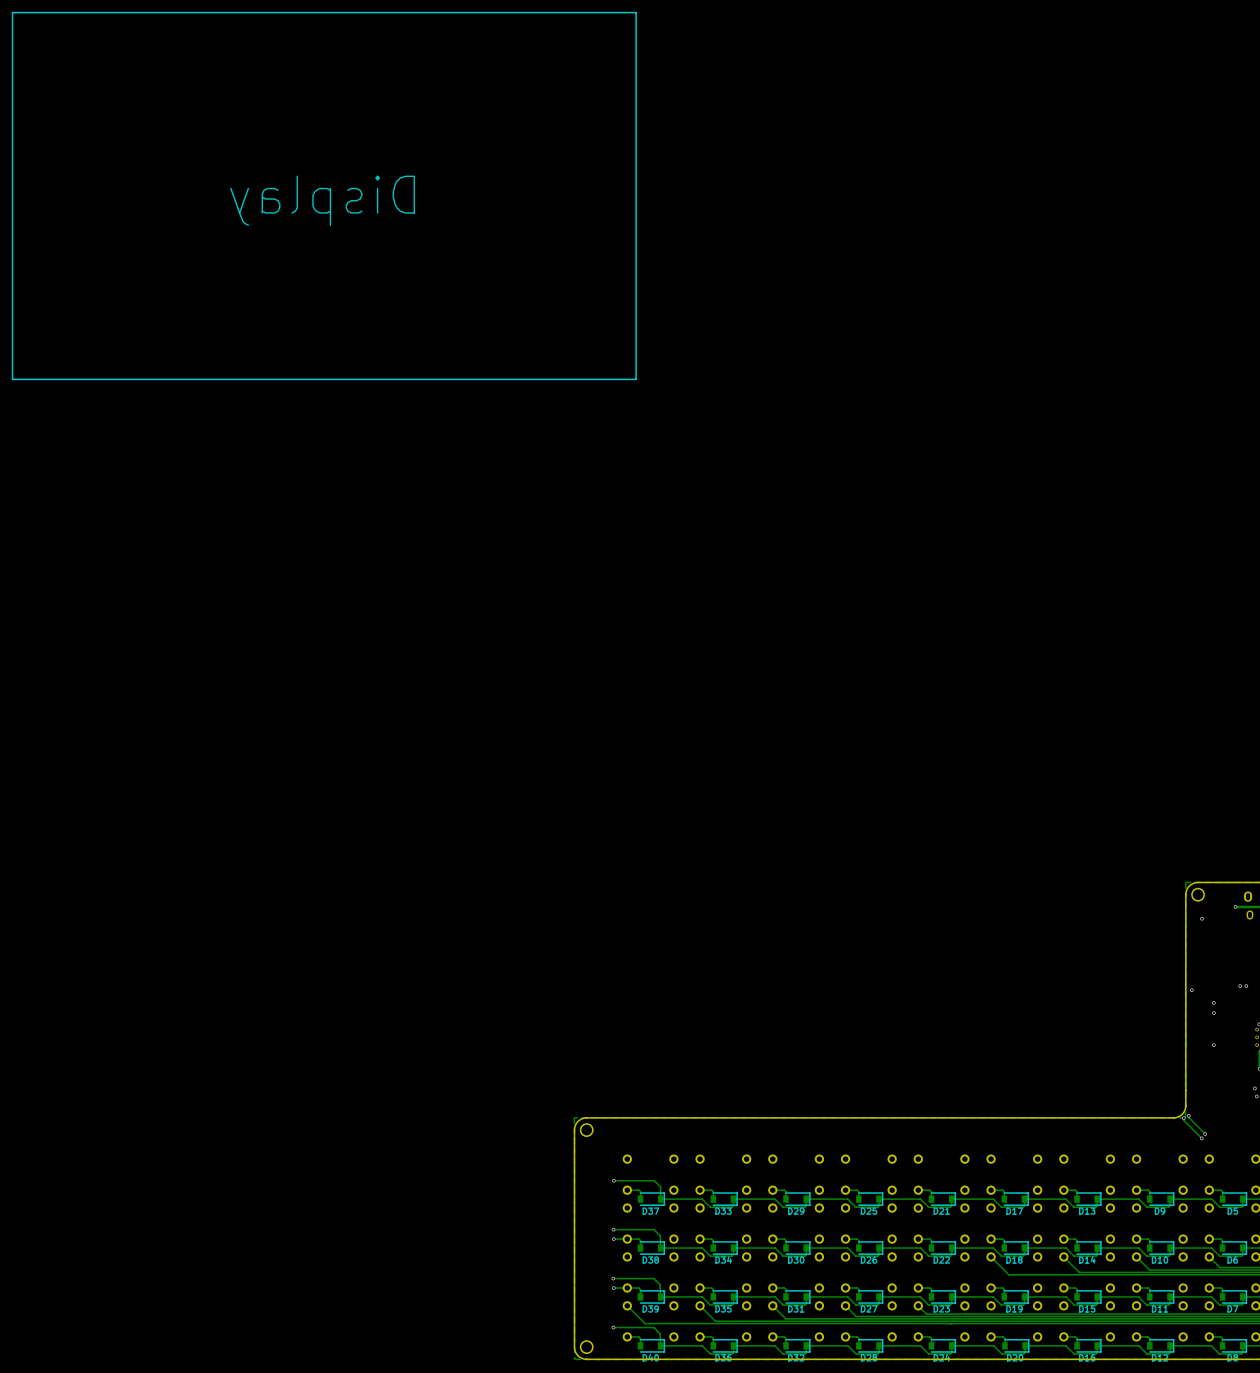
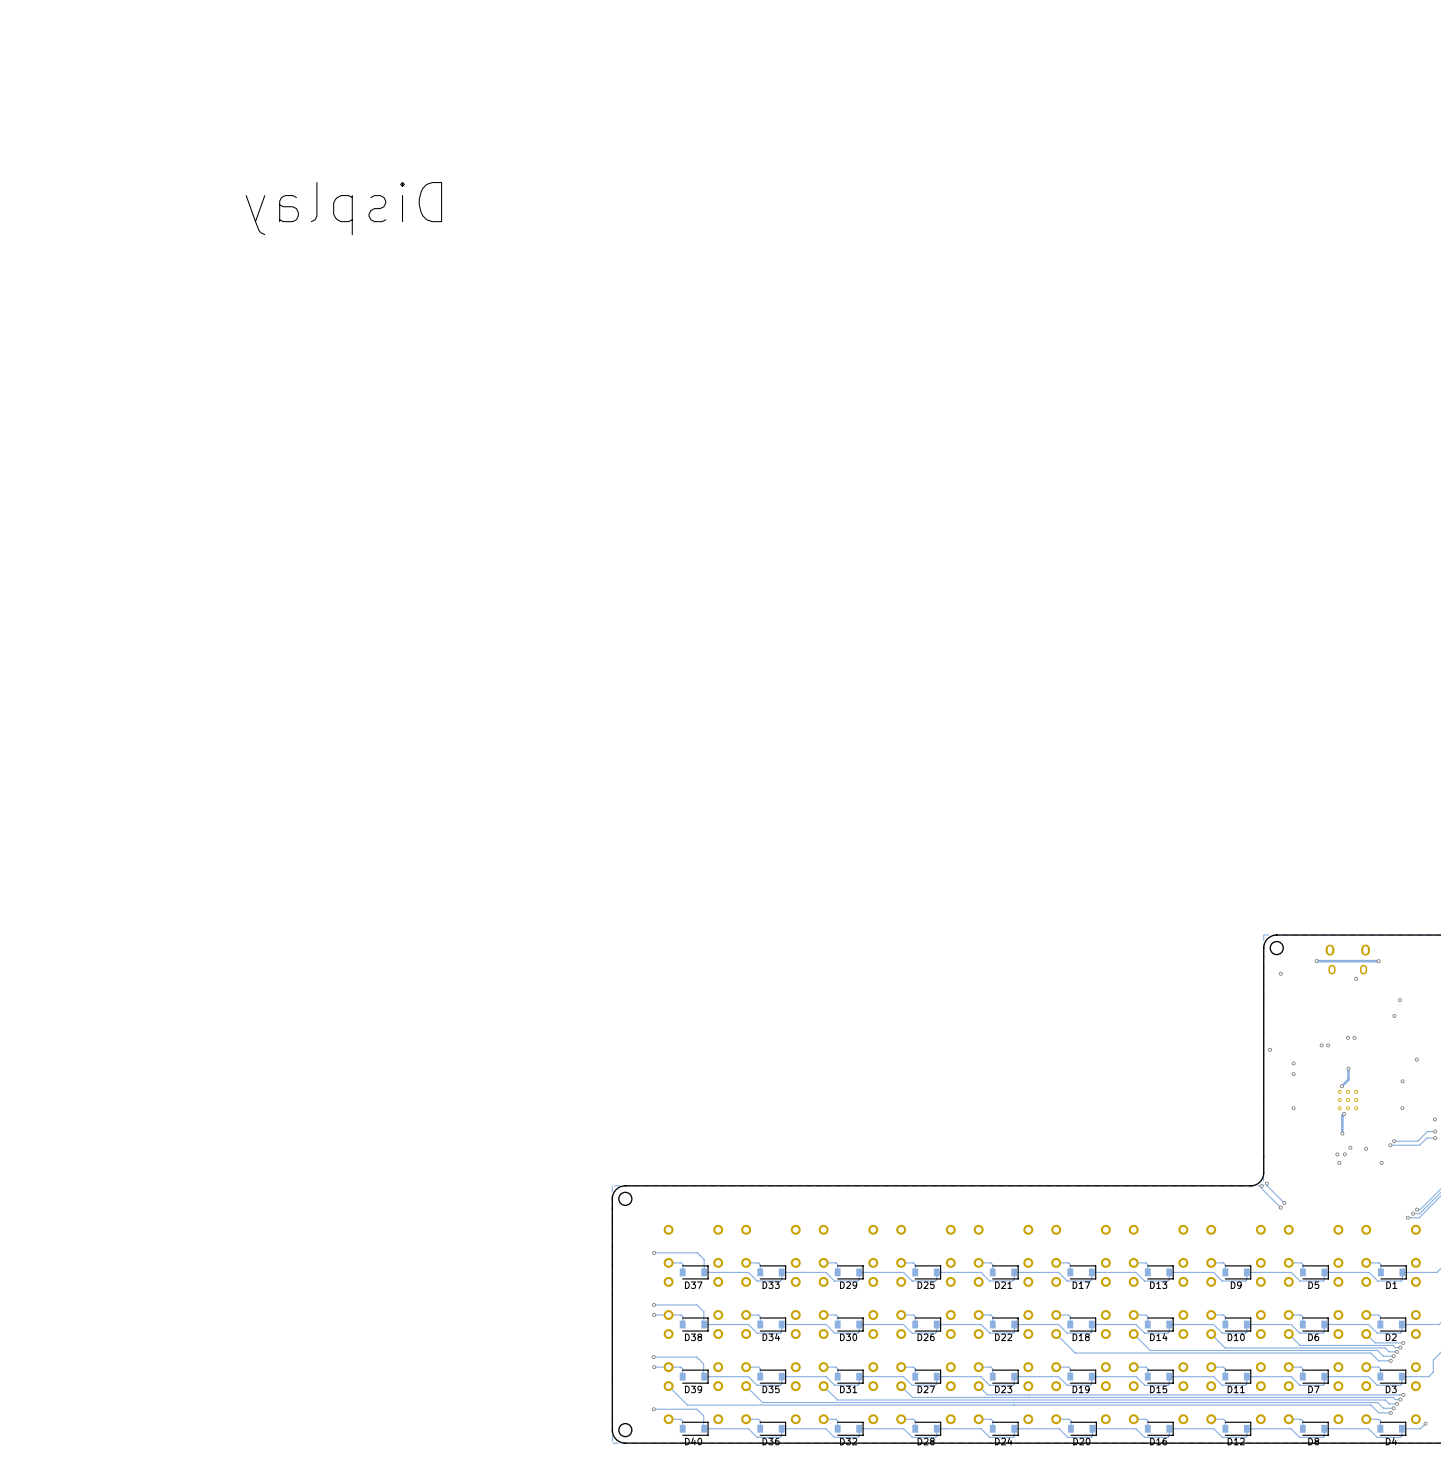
line: (636, 12) (636, 379) (12, 379) (12, 12) (636, 12) -> none

